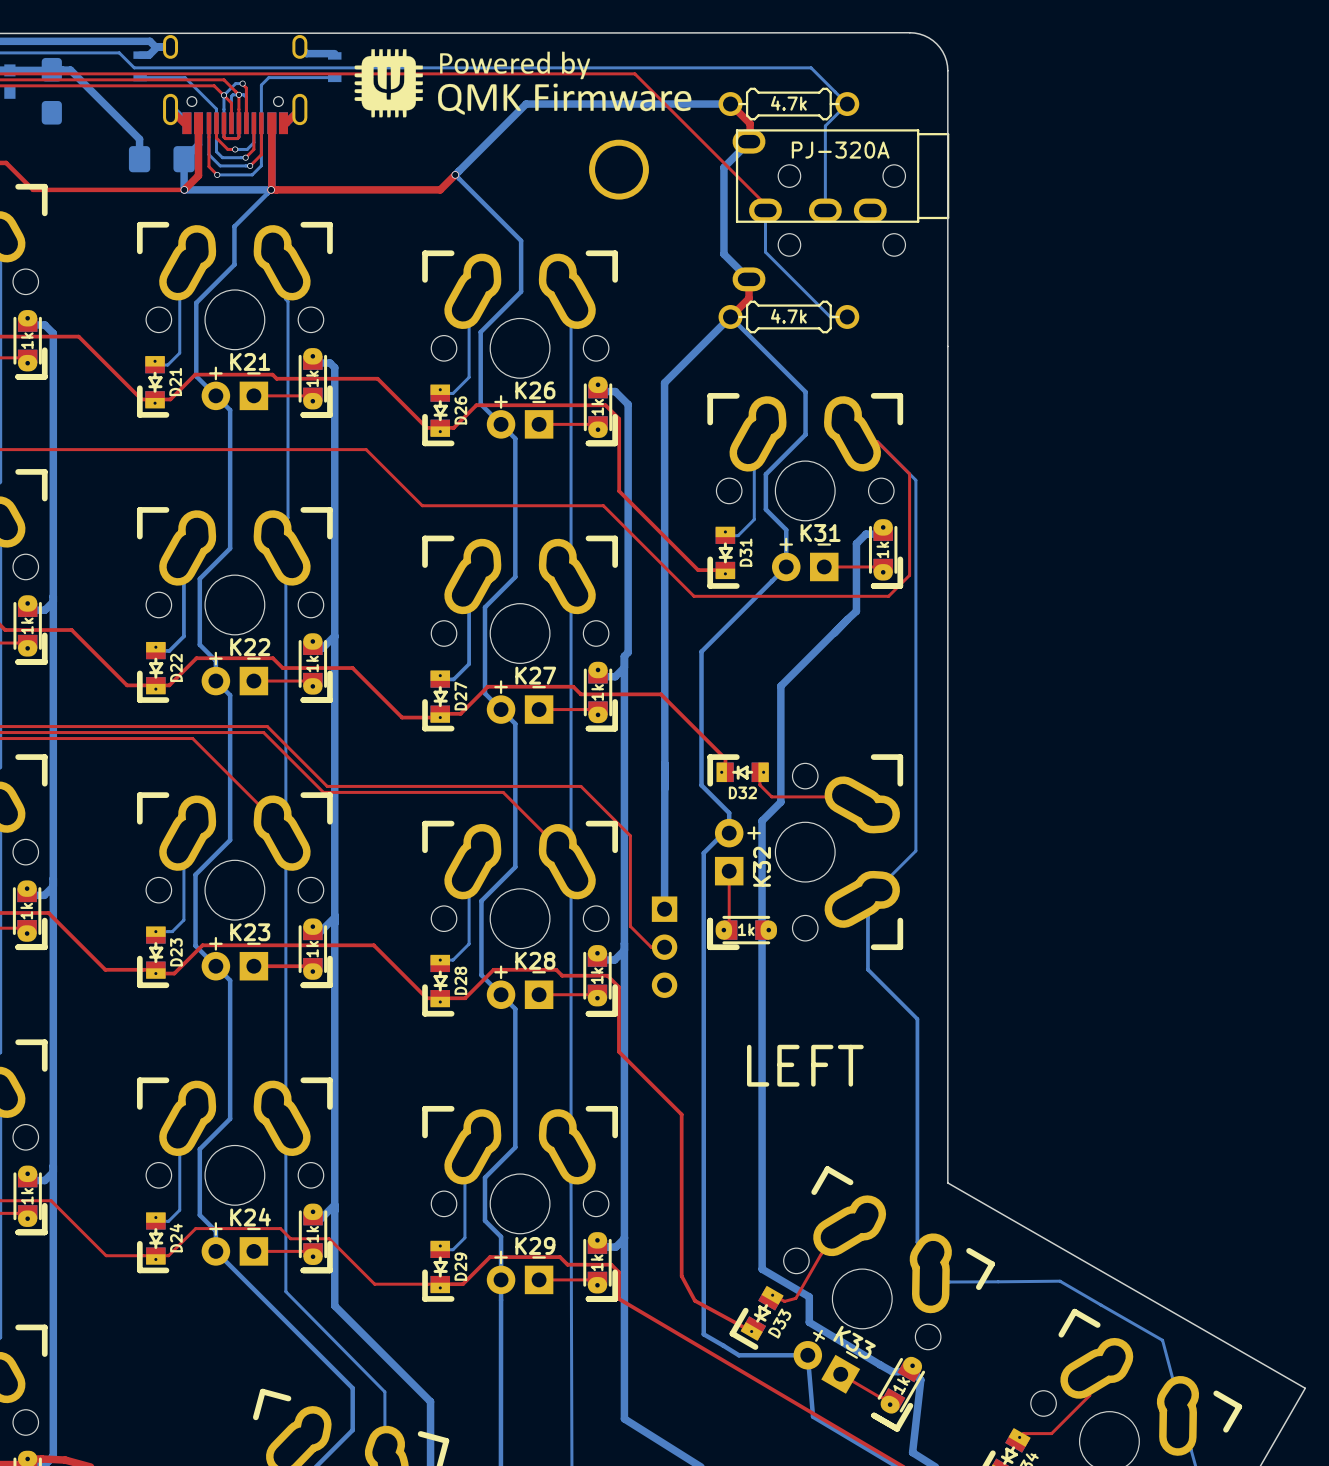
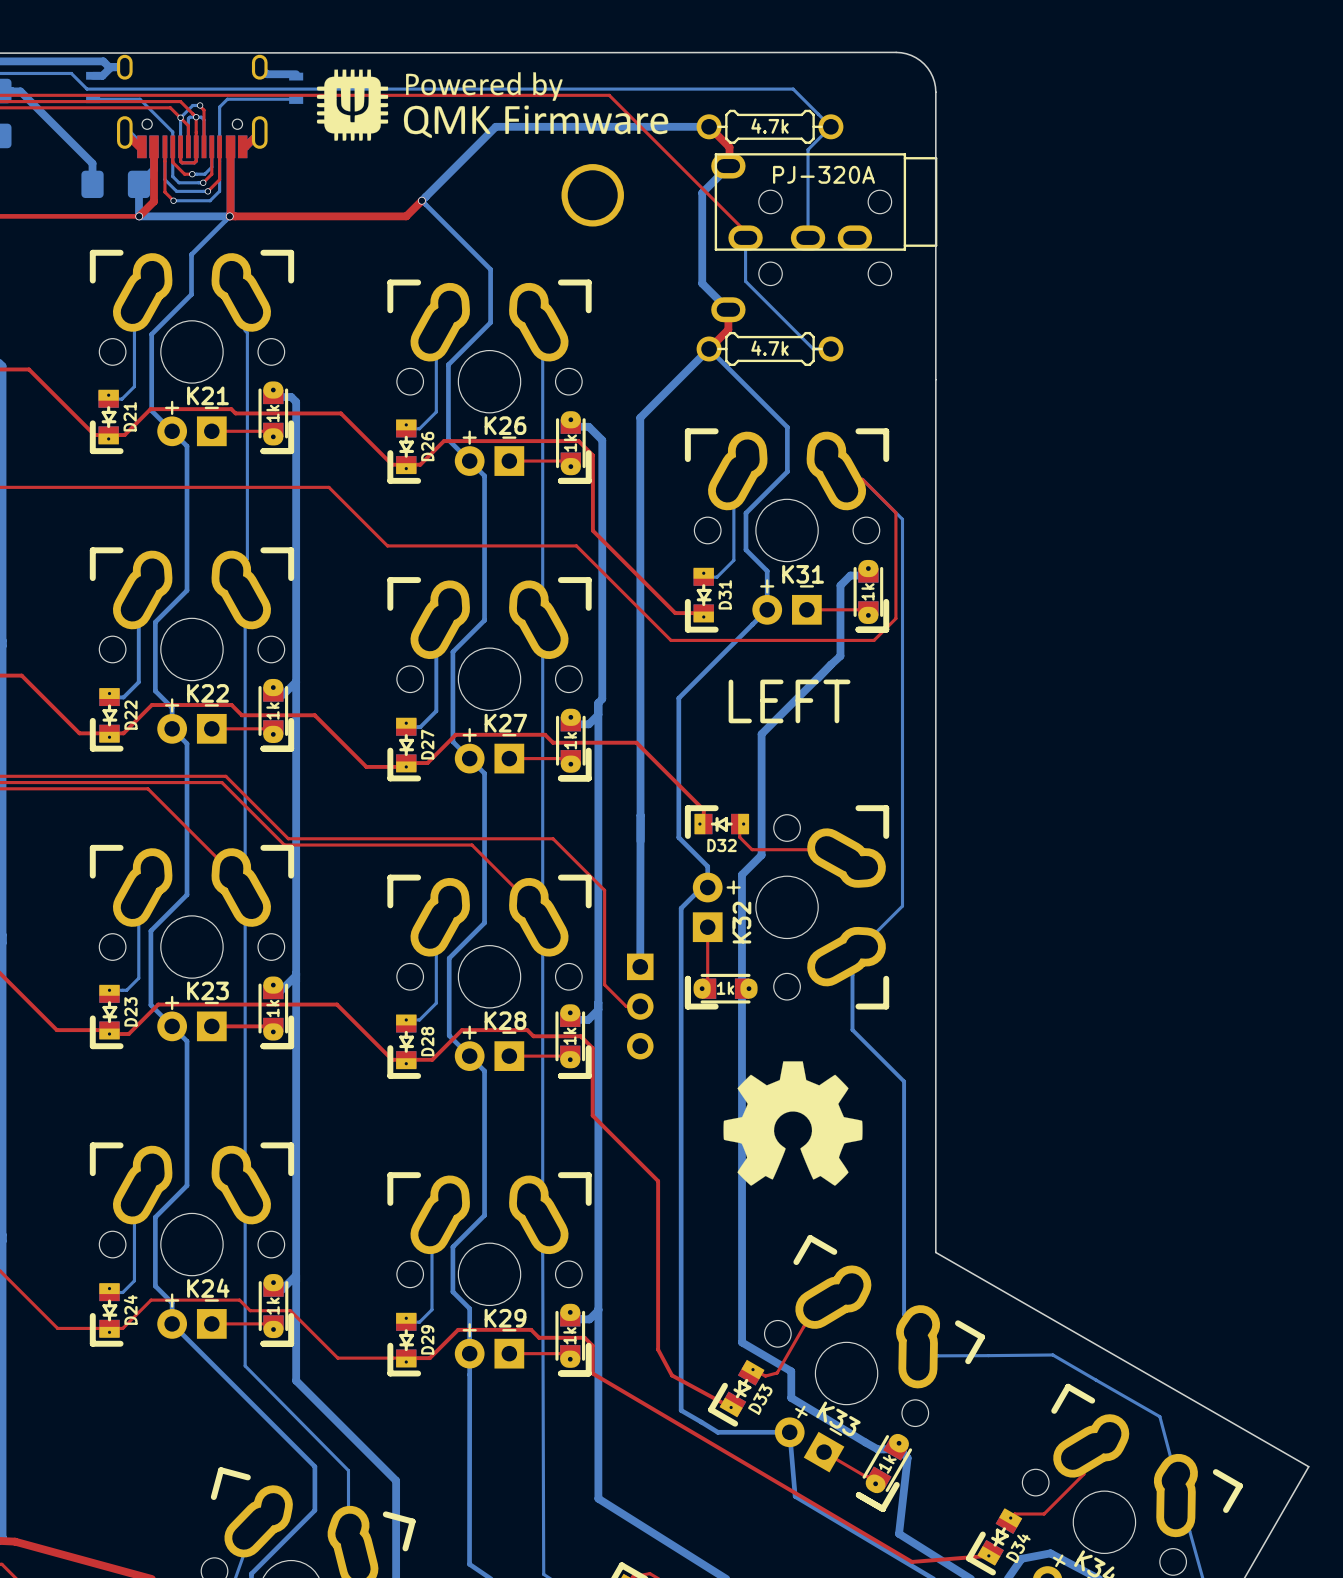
text: none -> LEFT (789, 701)
drawing: none -> [723, 1061, 863, 1186]
text: LEFT (805, 1065) -> none

